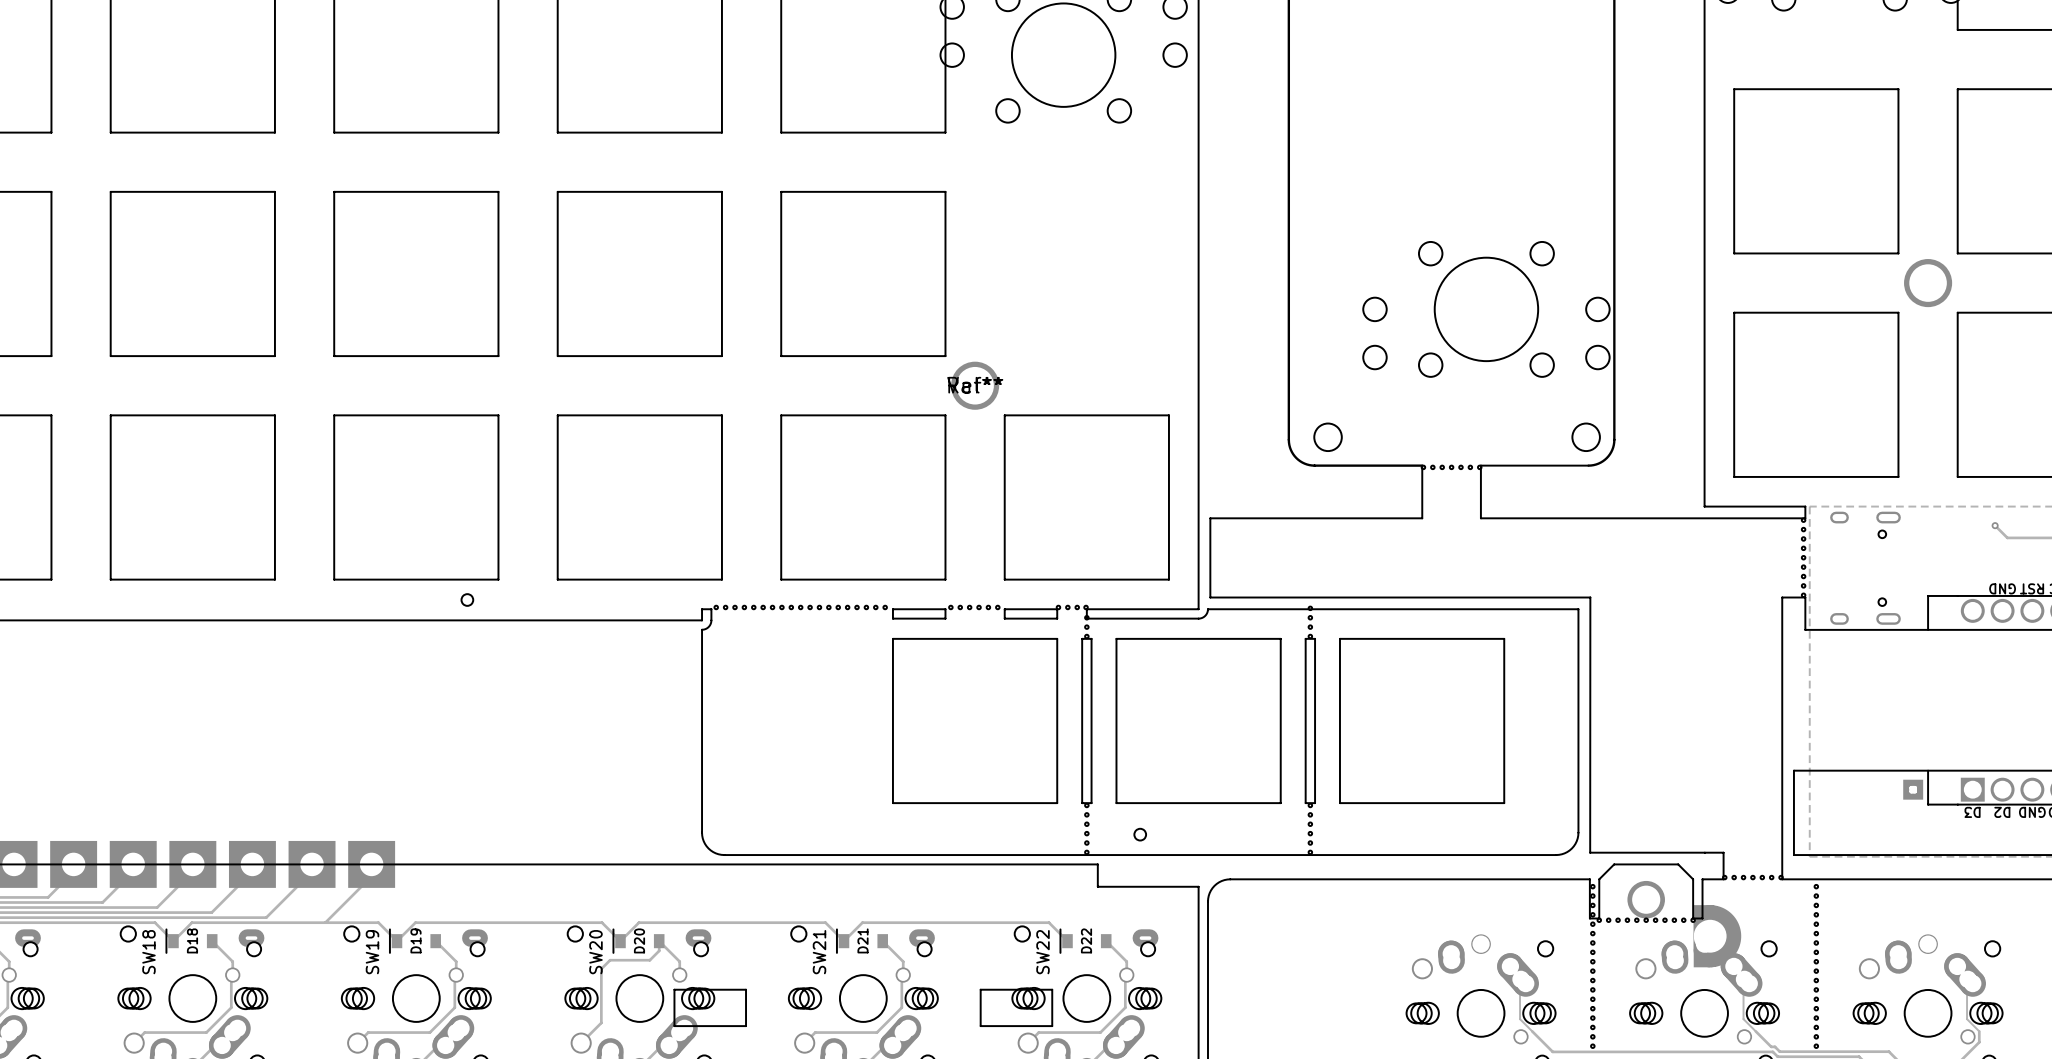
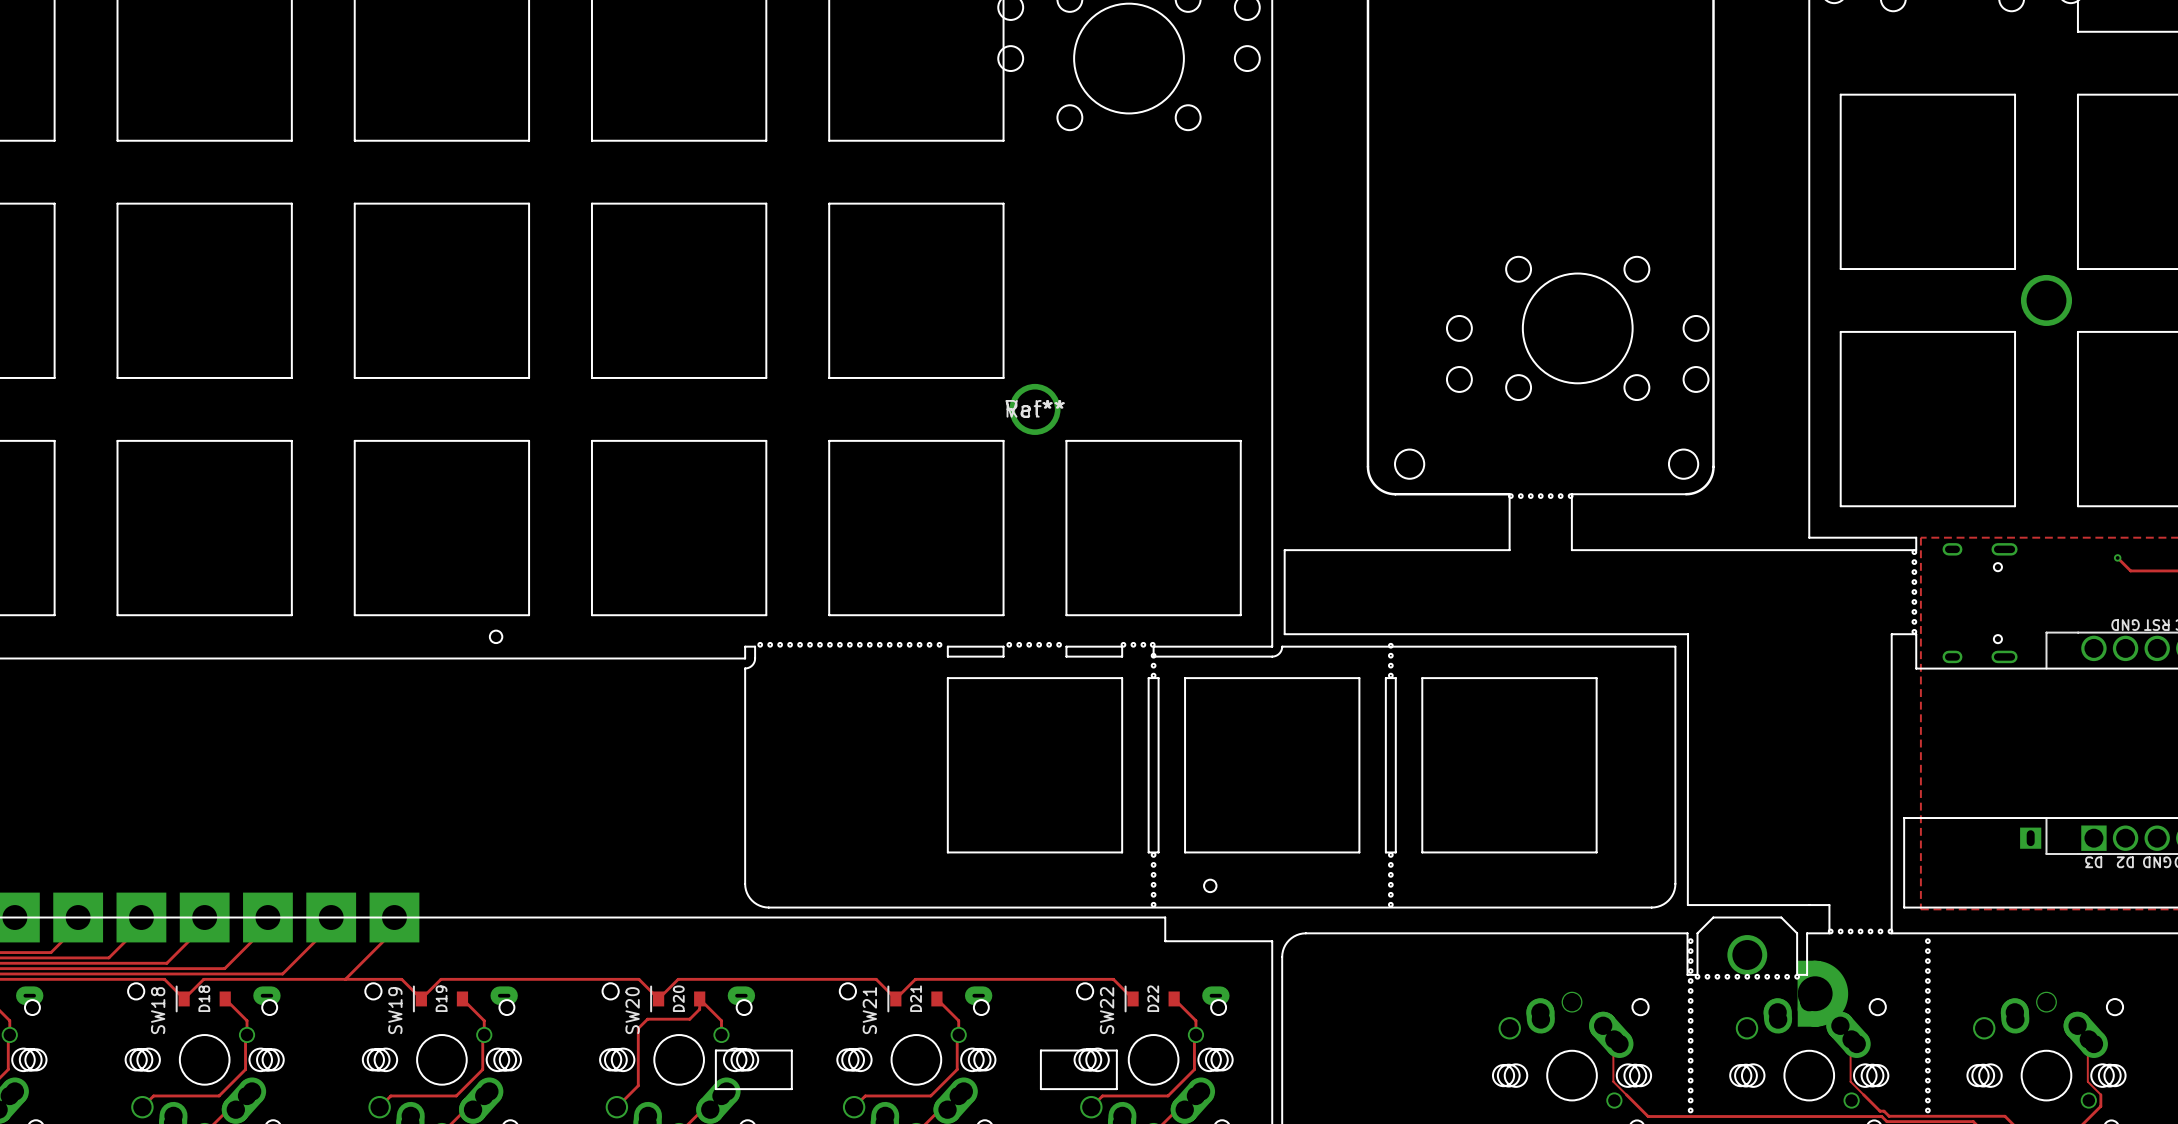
part footprint: [1903, 779, 1924, 800] -> [2020, 827, 2042, 849]

